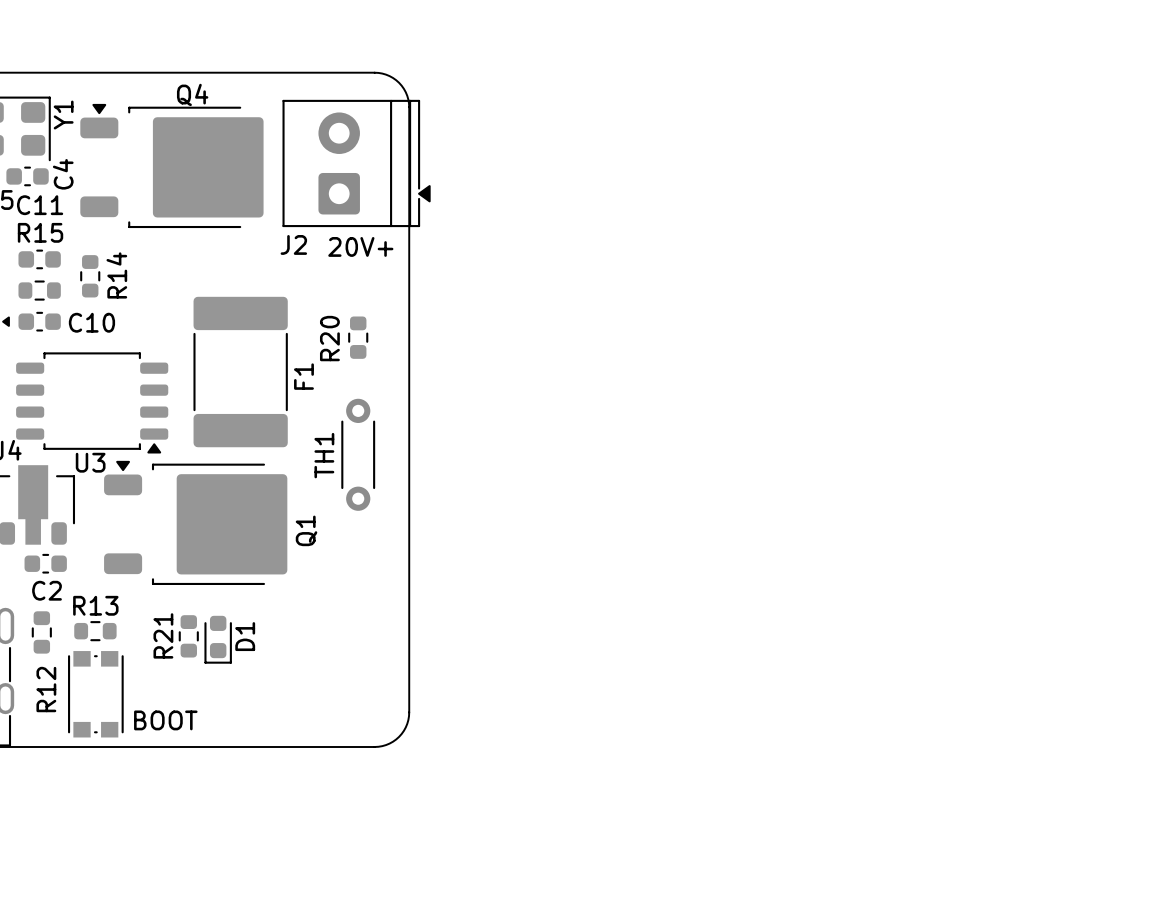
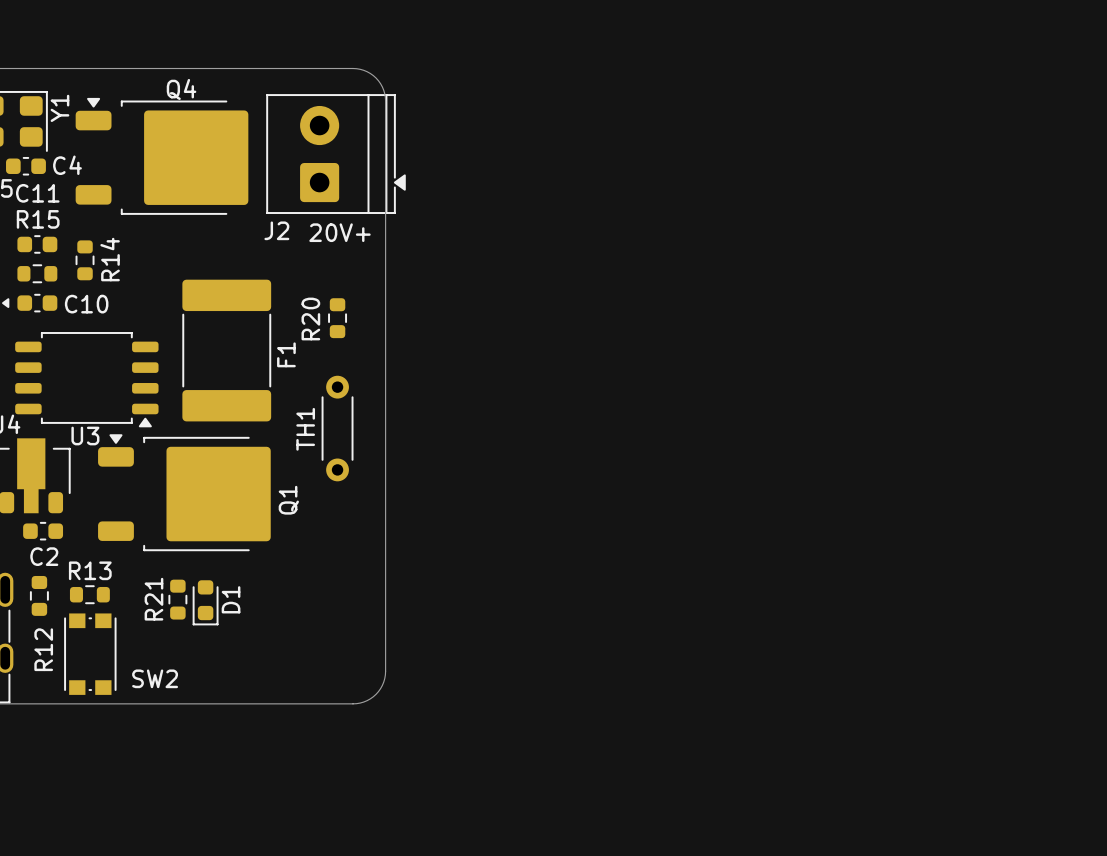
C4 name rotation: 0° (63, 174) -> 90° clockwise (67, 165)
BOOT name: BOOT (165, 720) -> SW2 (155, 678)

